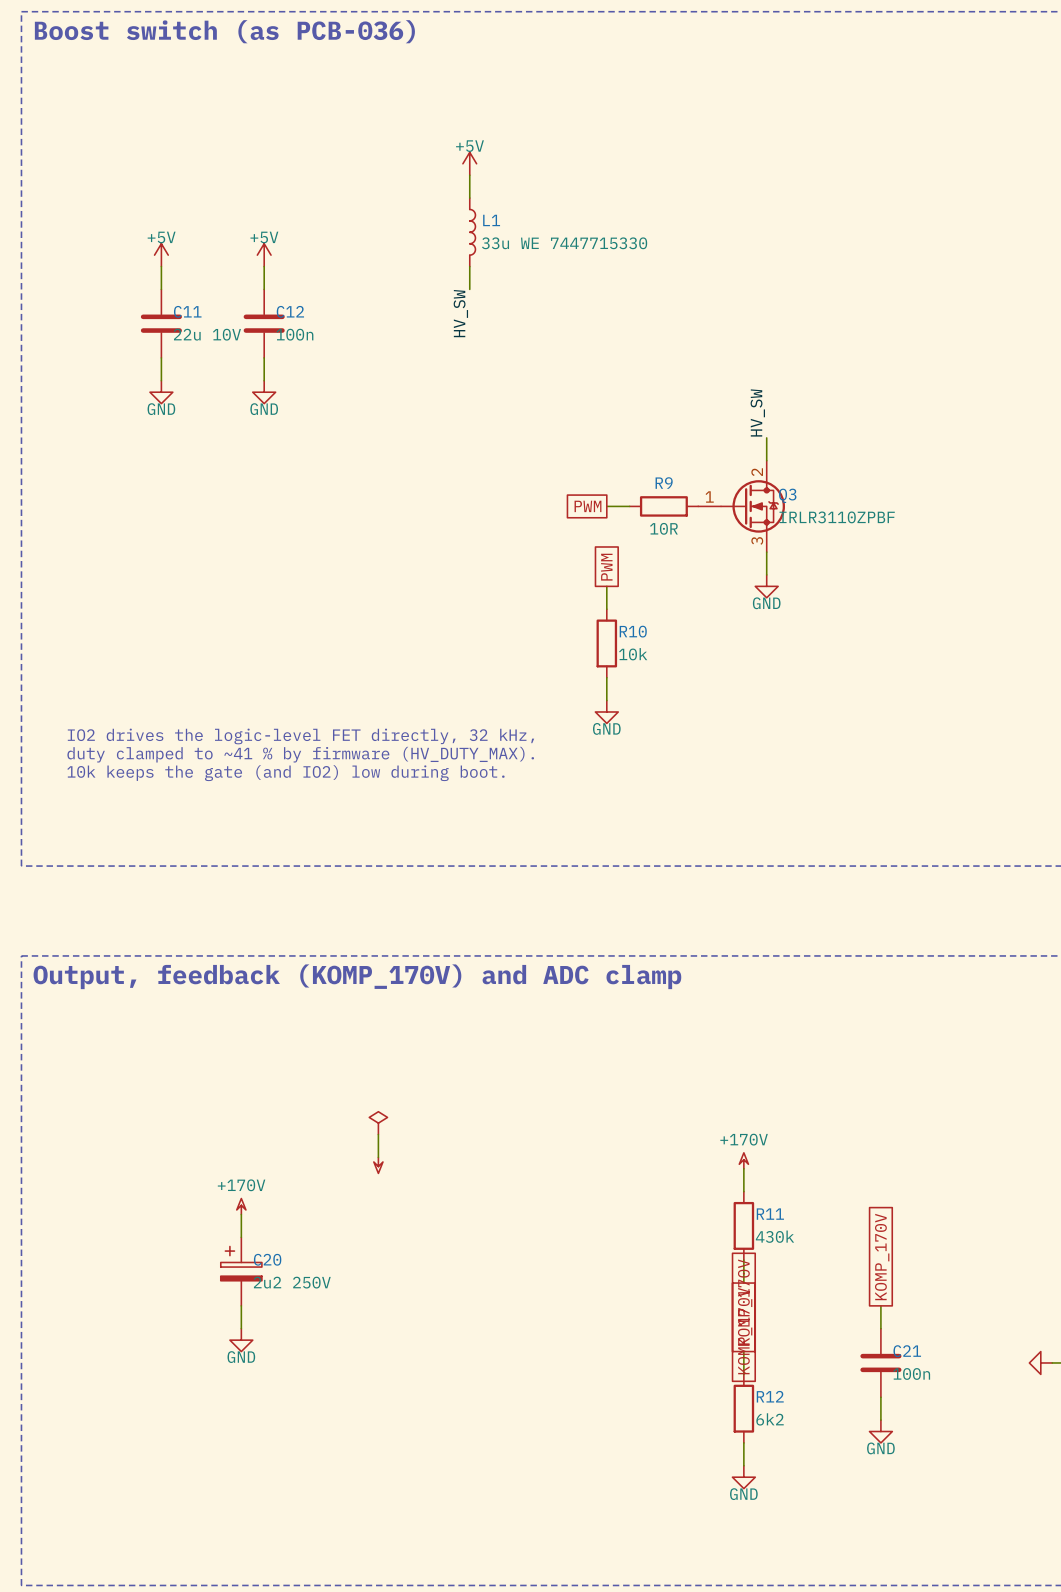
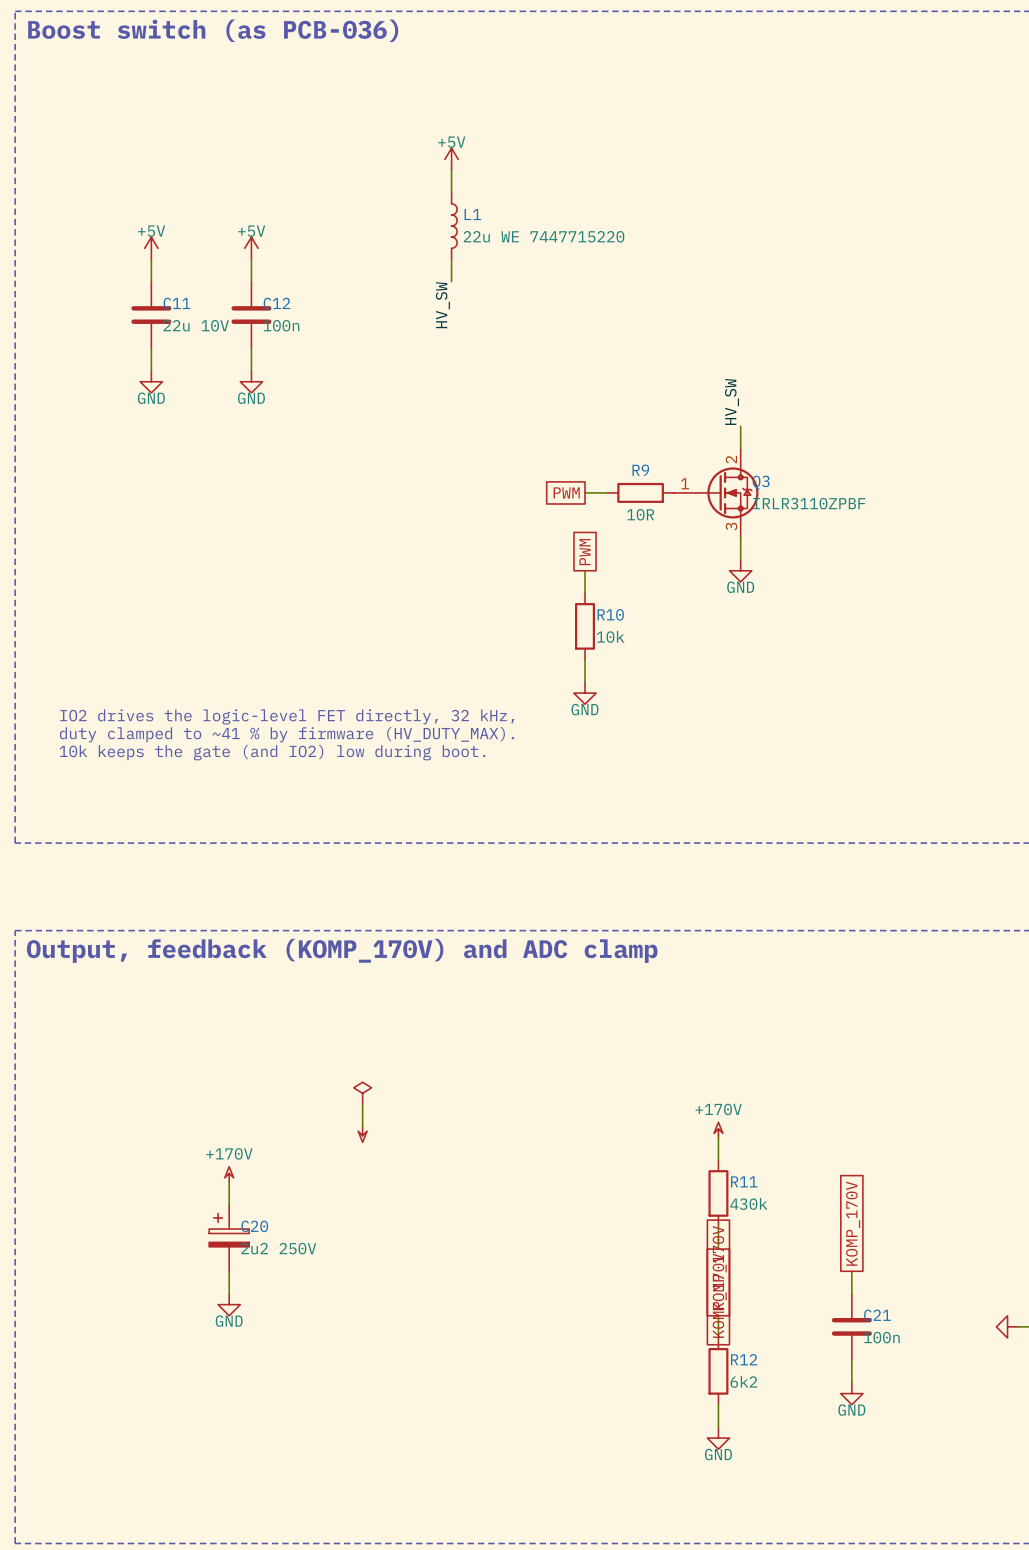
L1 value: 33u WE 7447715330 (564, 243) -> 22u WE 7447715220 (544, 236)

